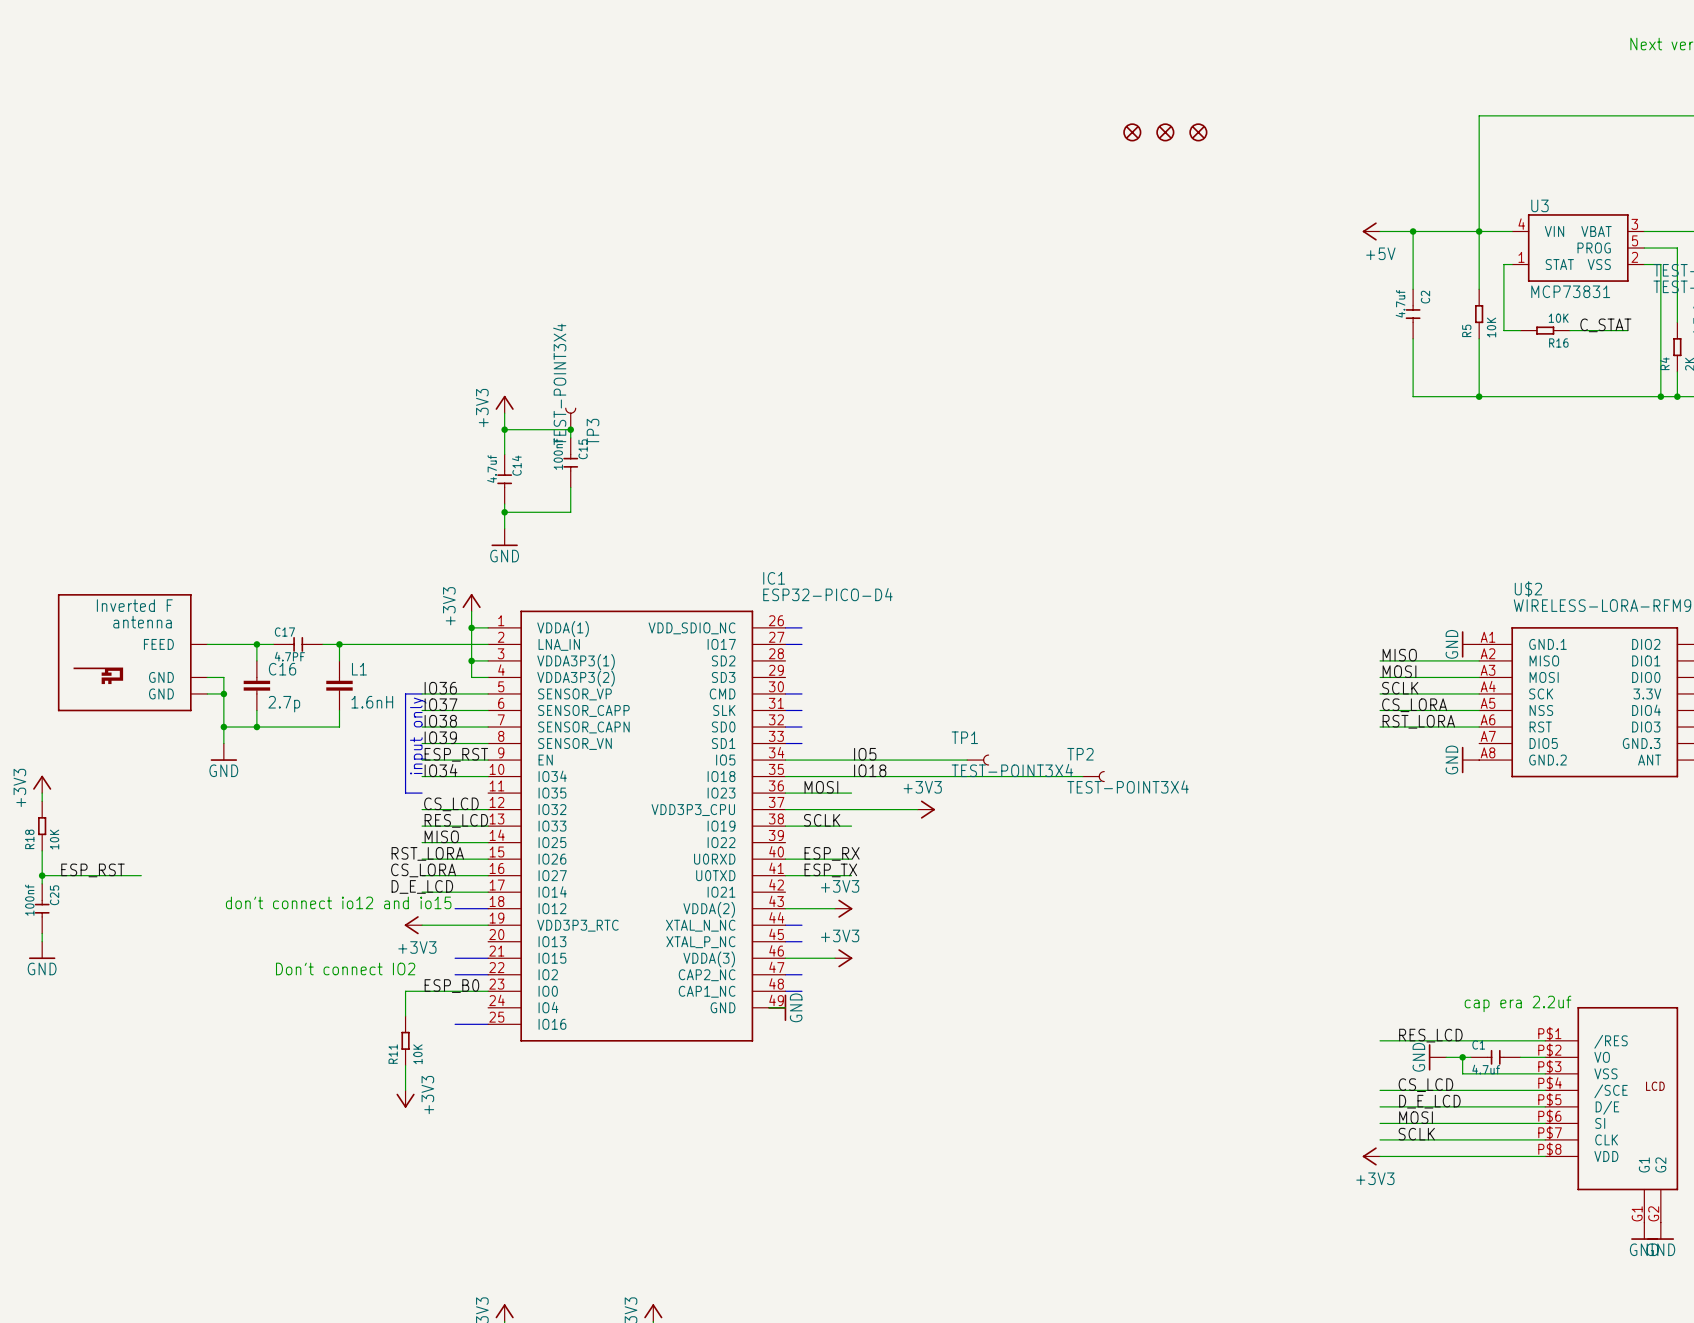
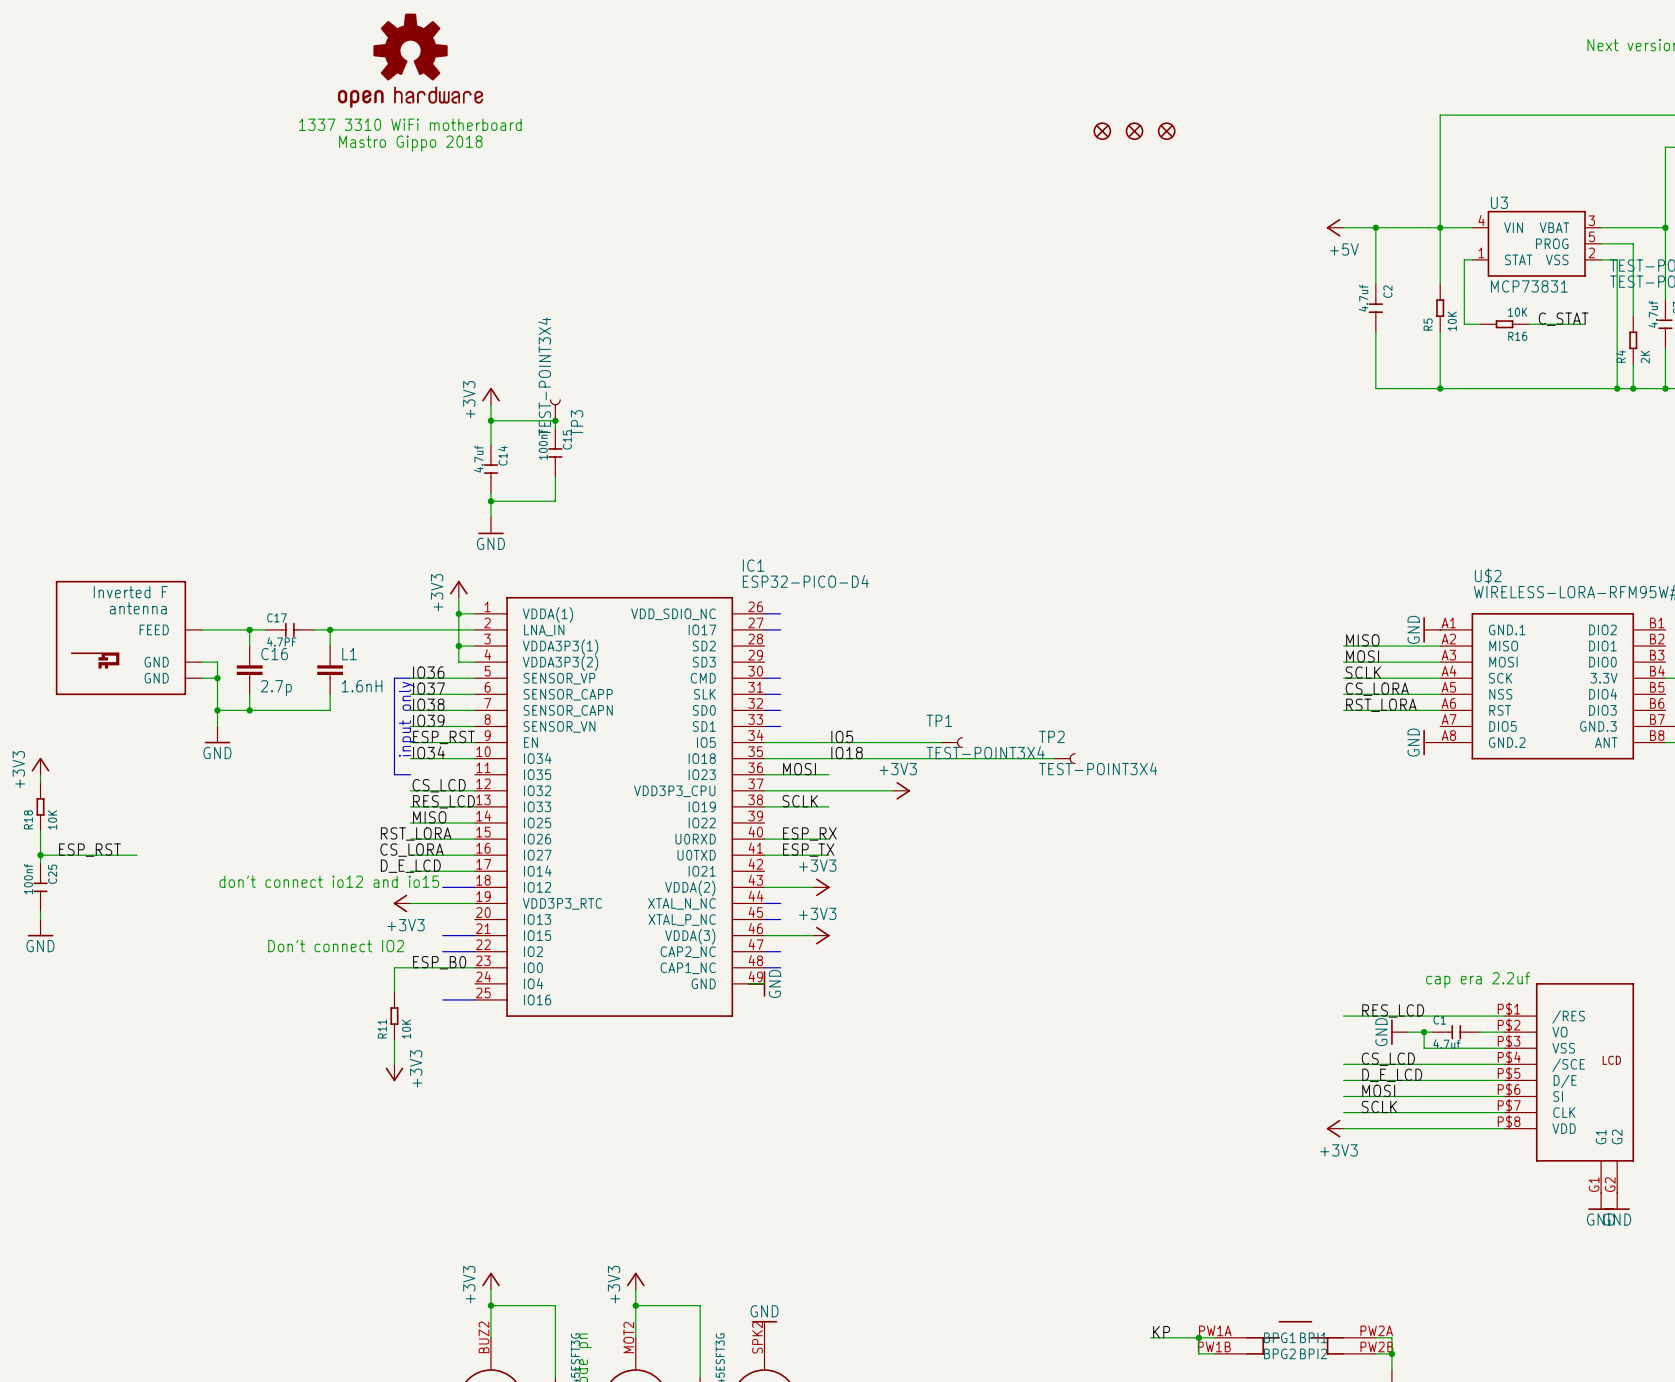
part: none -> (410, 60)
text: none -> 1337 3310 WiFi motherboard (410, 124)
text: none -> Mastro Gippo 2018 (410, 143)

